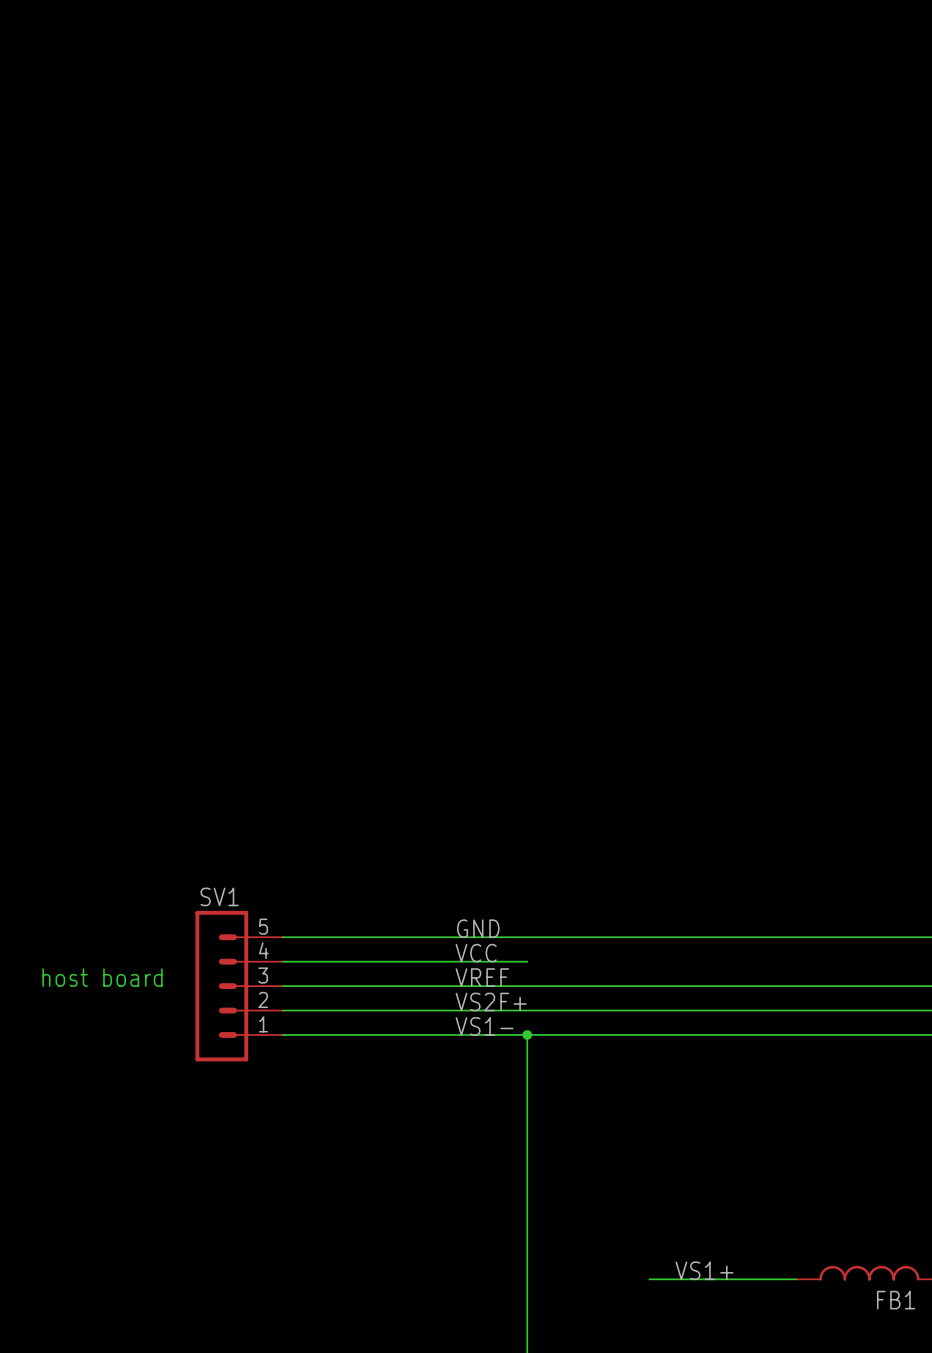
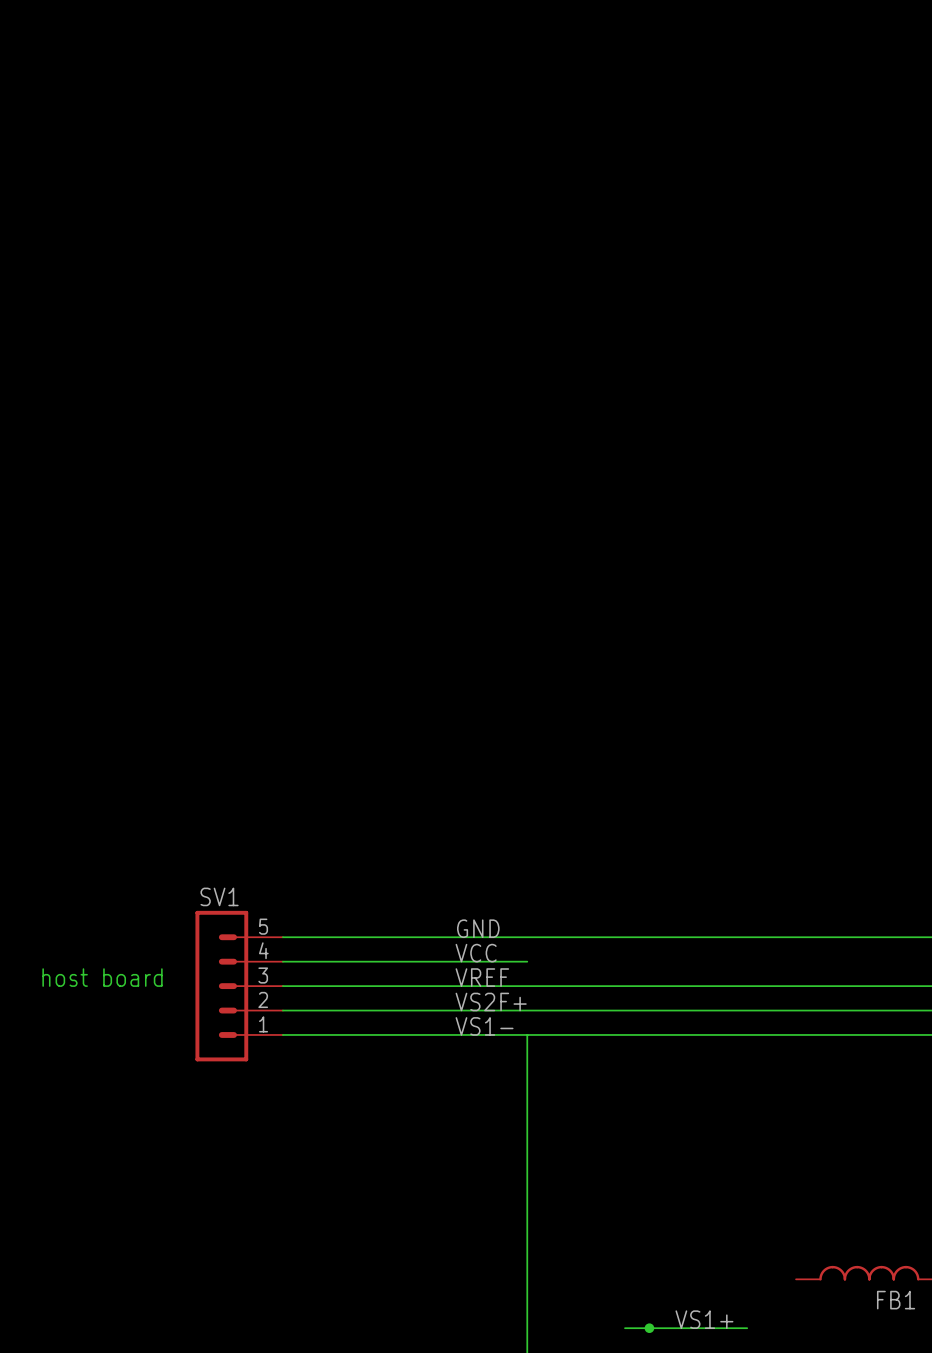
junction: (527, 1034) -> none
label position: VS1+ (704, 1270) -> VS1+ (704, 1319)
wire: (649, 1279) (796, 1279) -> none
wire: none -> (625, 1328) (747, 1328)
junction: none -> (649, 1328)

